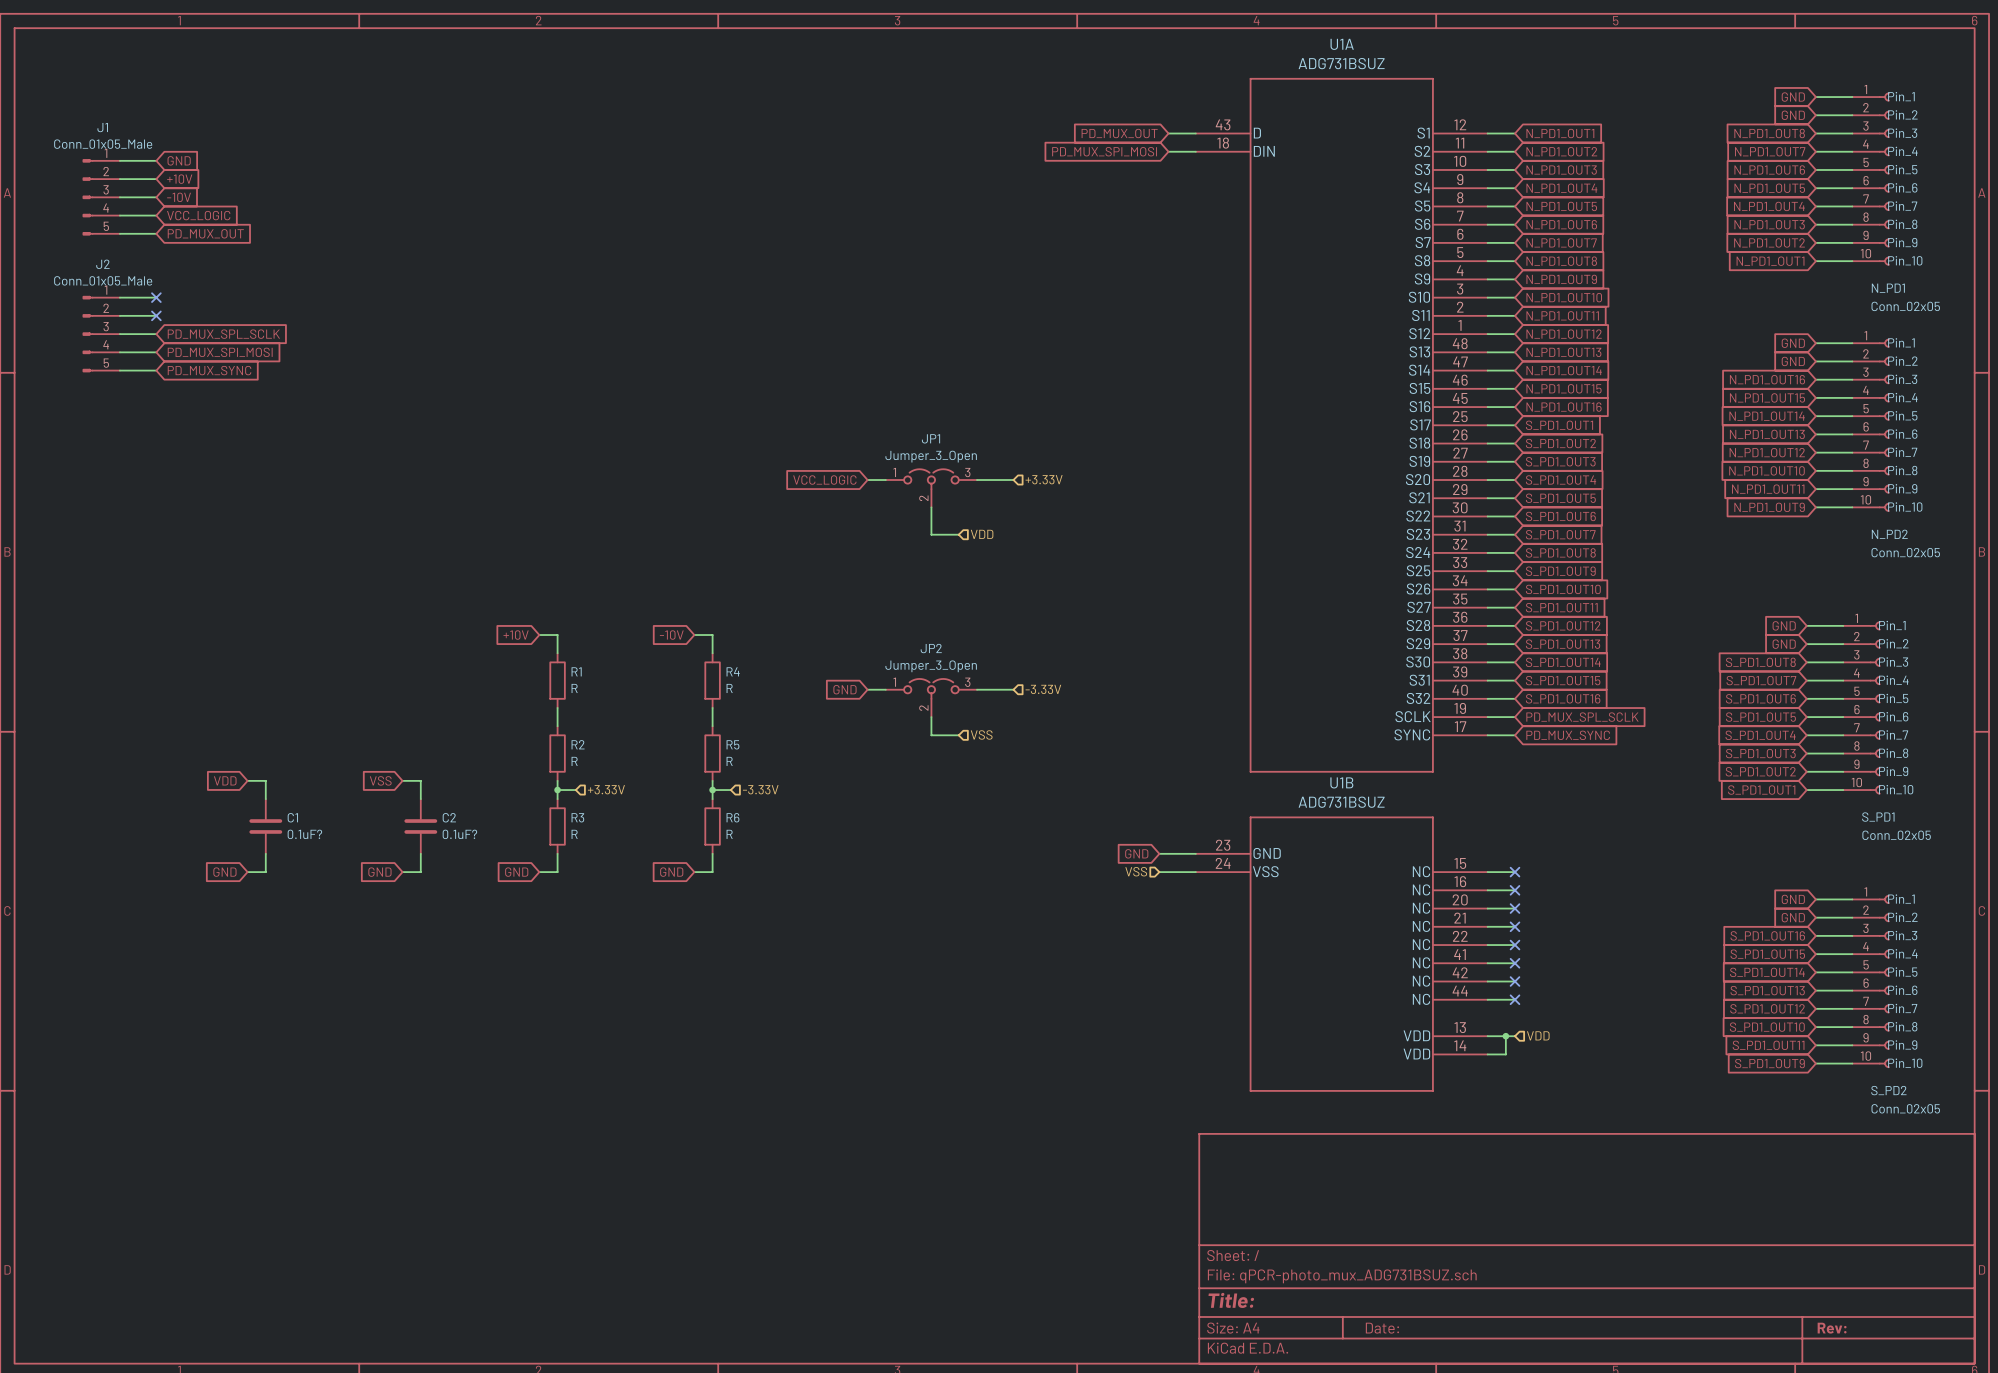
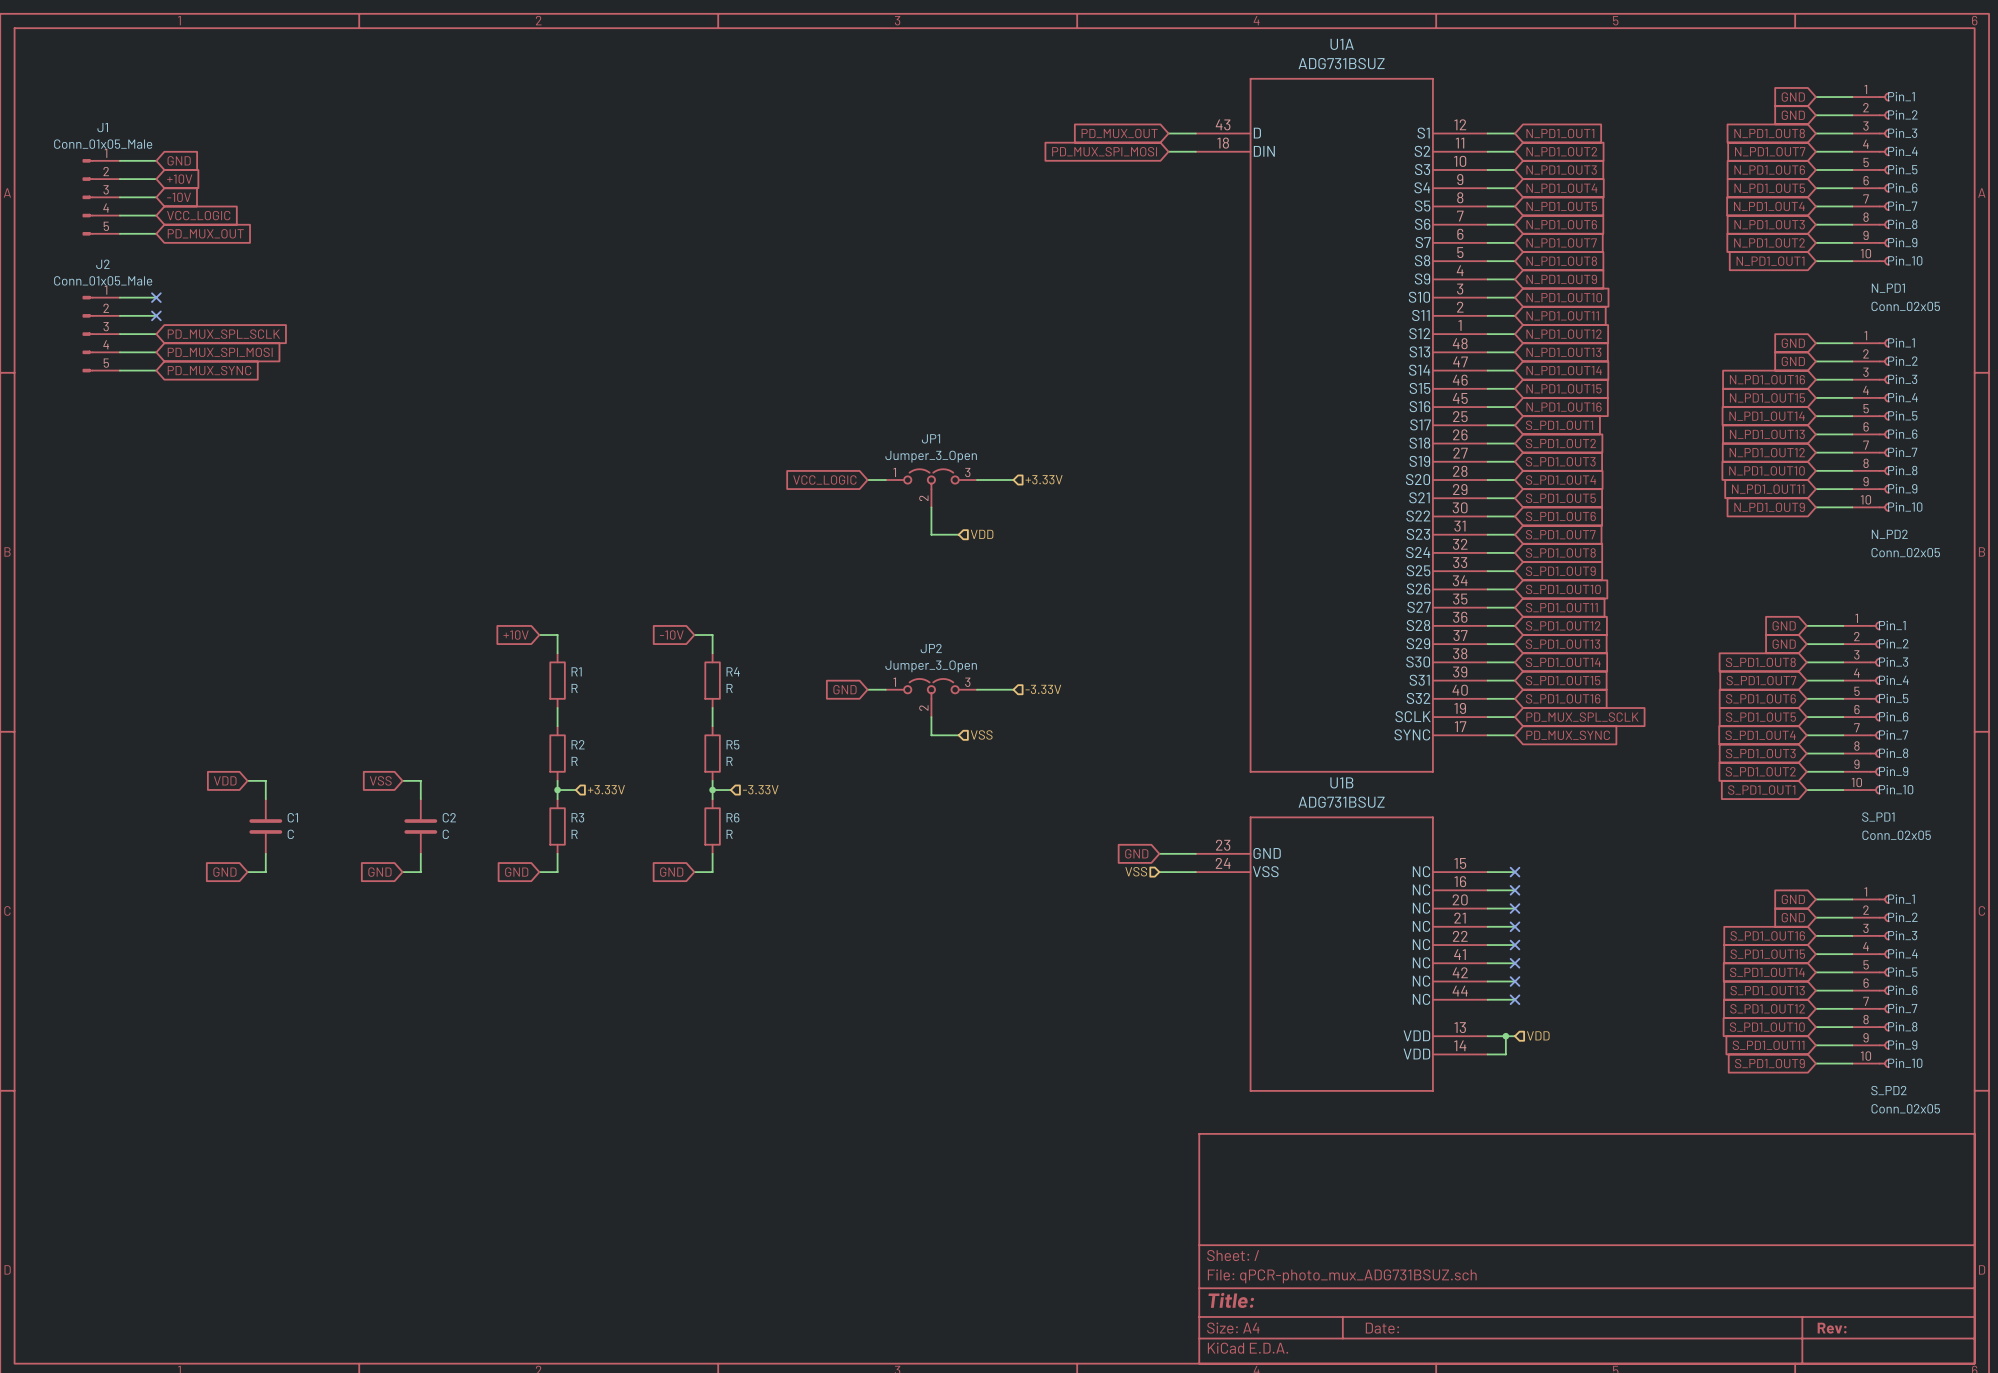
C1 value: 0.1uF? (304, 834) -> C (290, 834)
C2 value: 0.1uF? (459, 834) -> C (445, 834)

